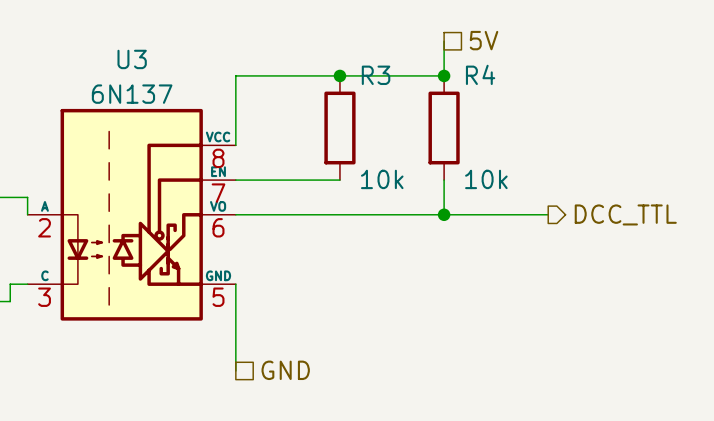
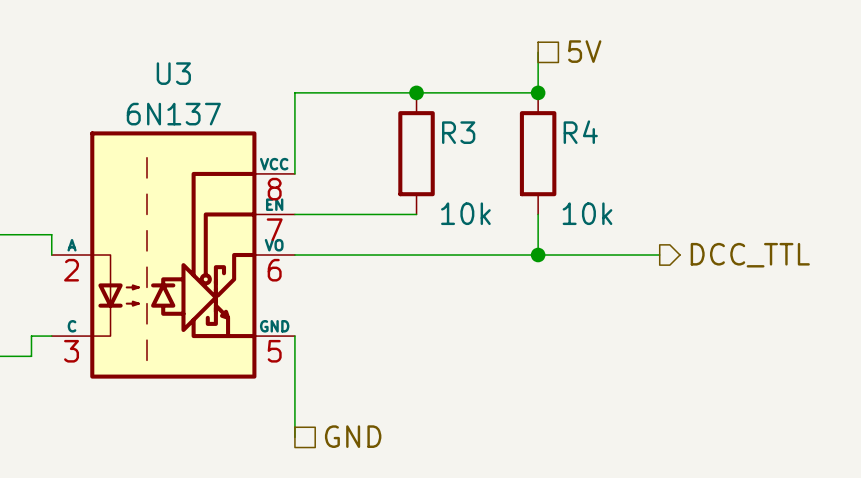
R4 name position: R4 (480, 74) -> R4 (580, 132)
R3 name position: R3 (376, 75) -> R3 (458, 132)

